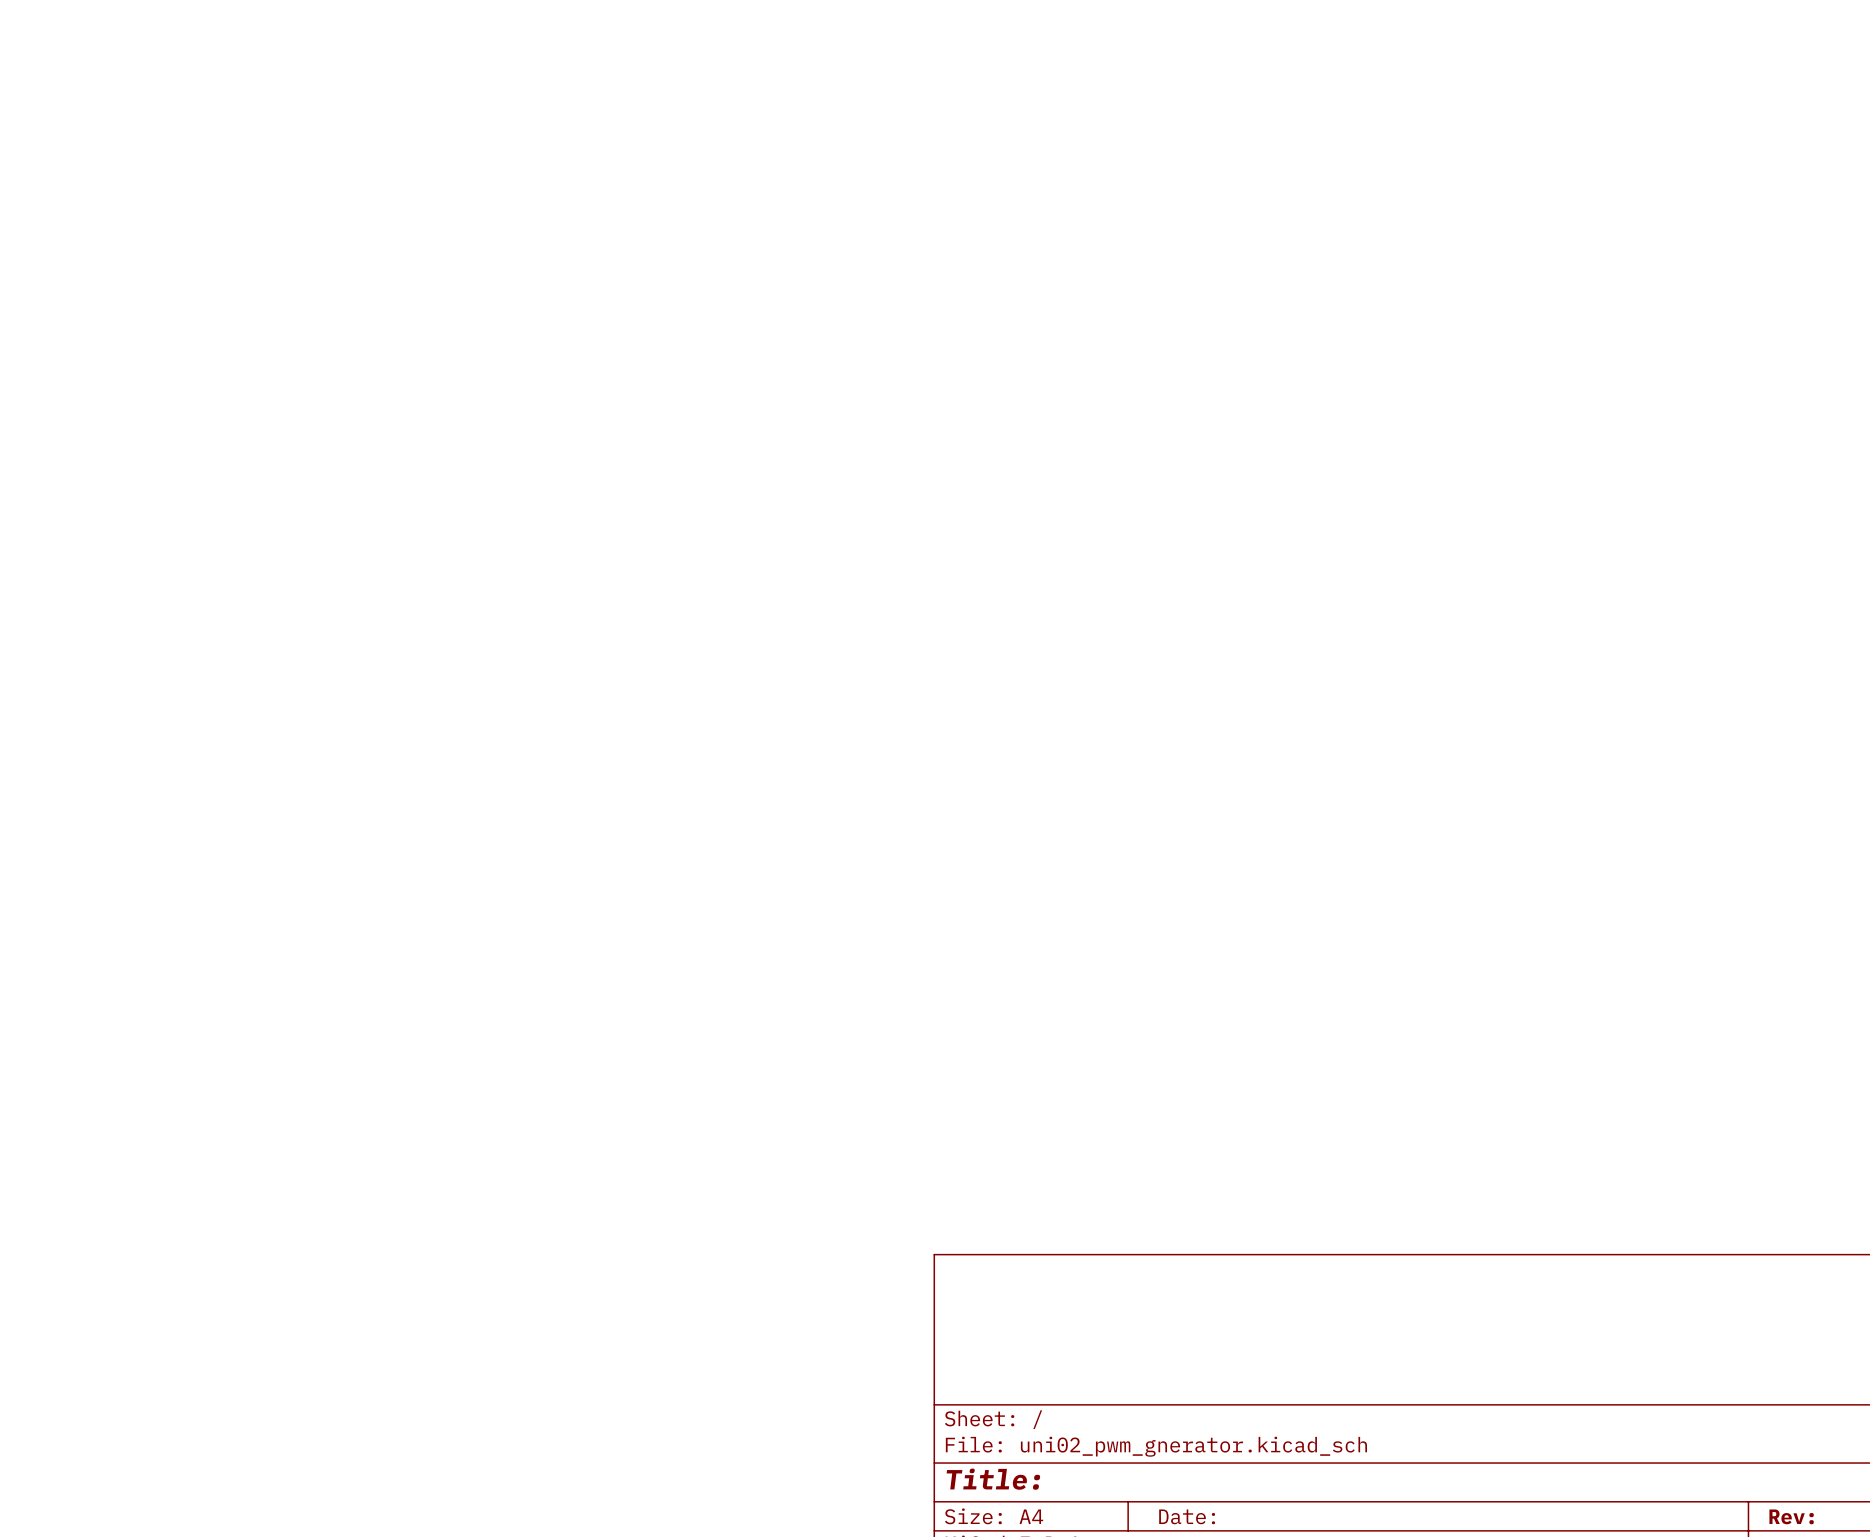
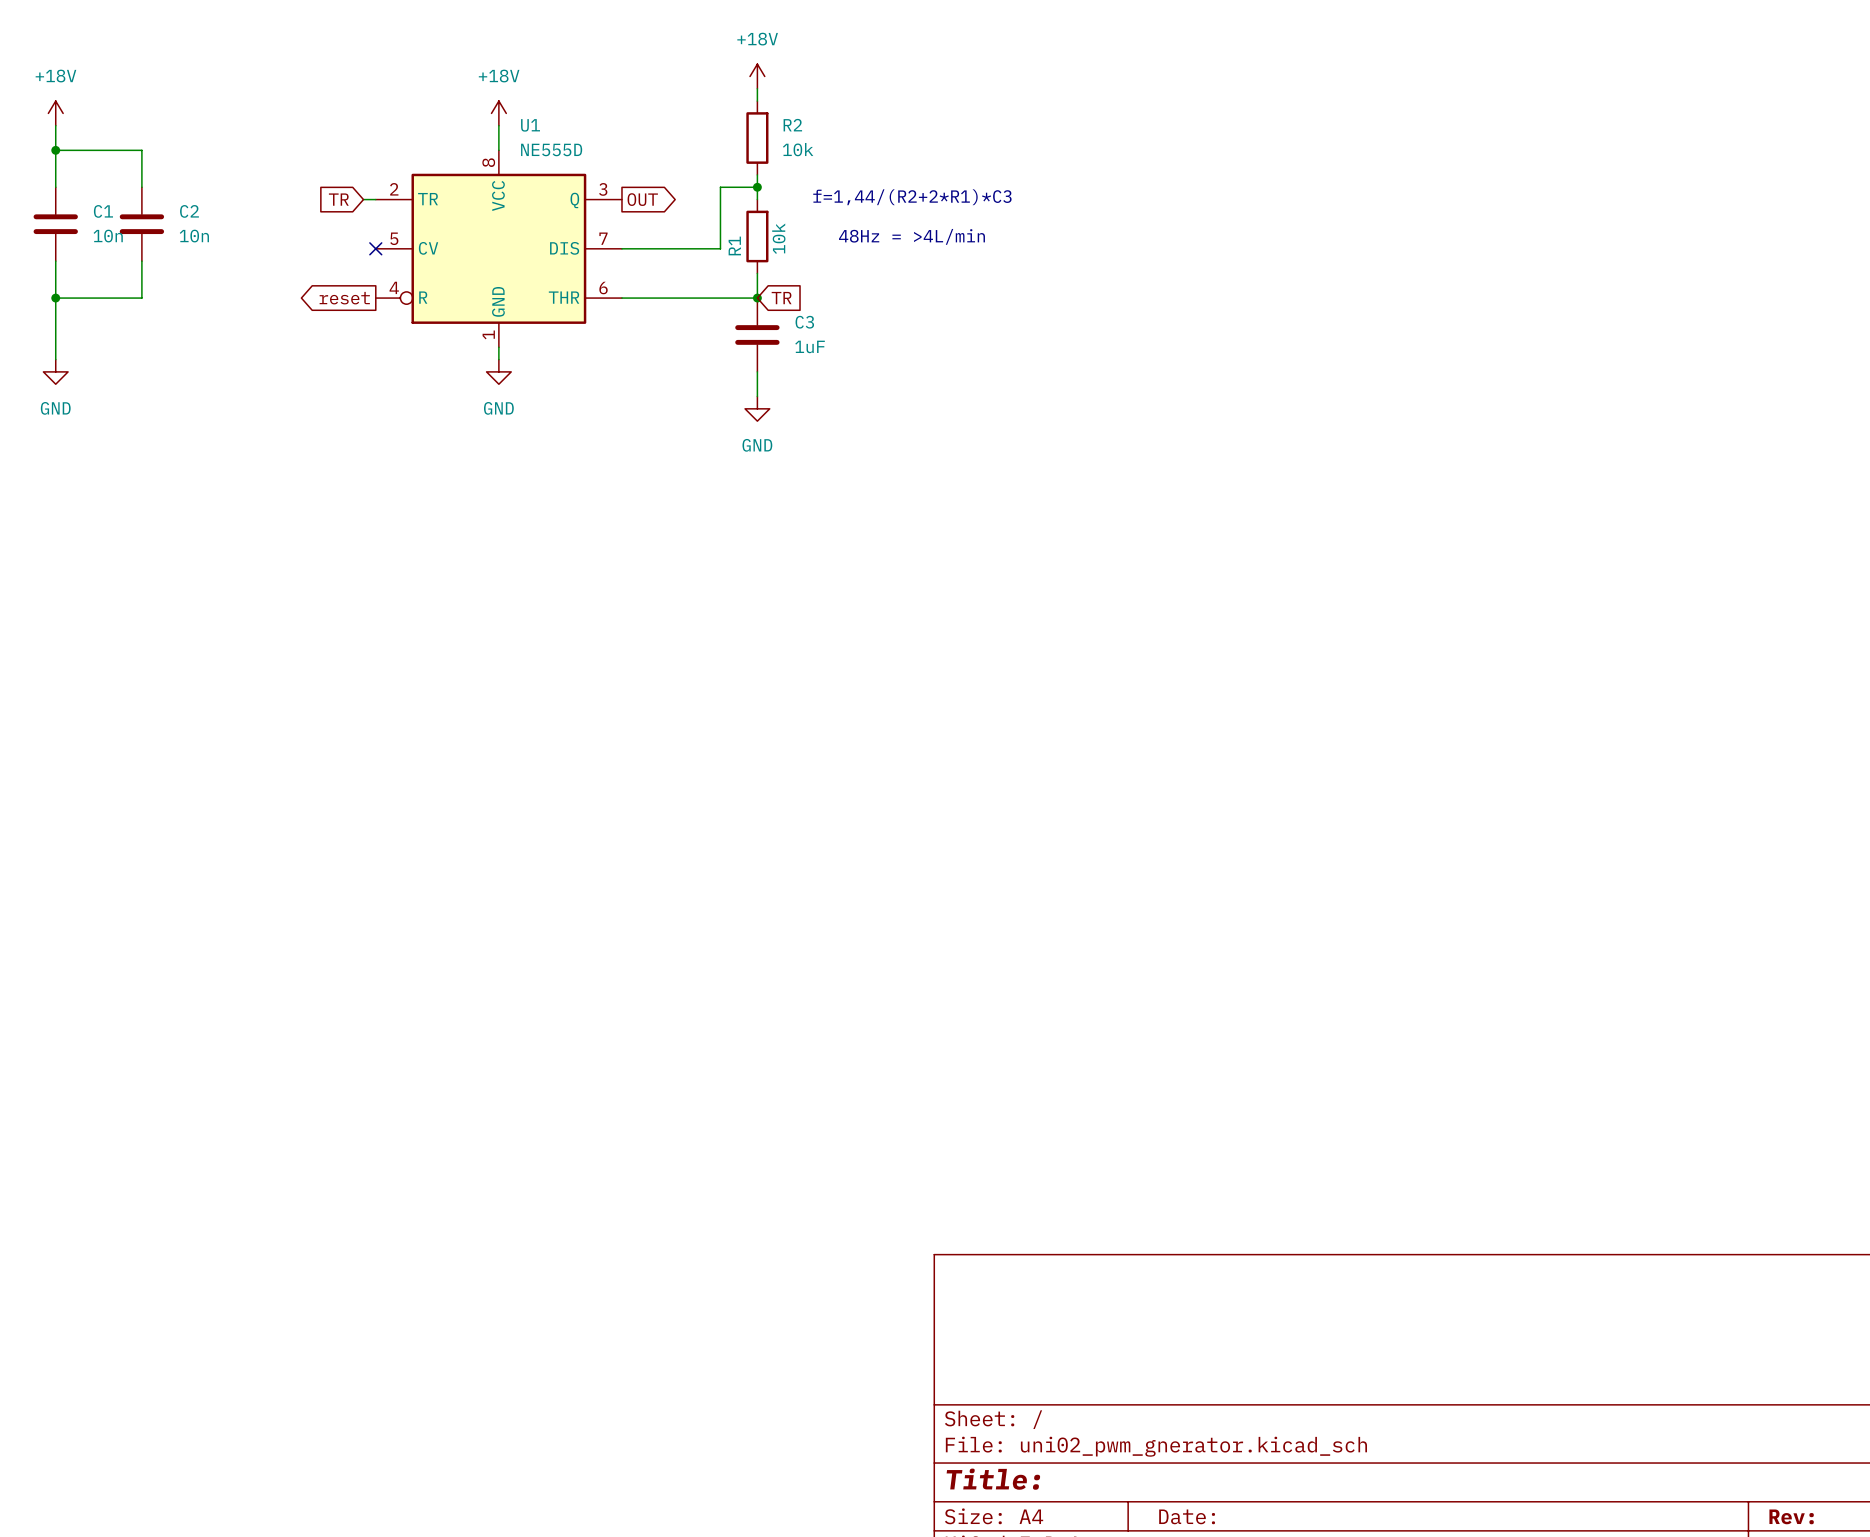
power symbol: none -> +18V (757, 76)
wire: none -> (757, 88) (757, 101)
power symbol: none -> +18V (55, 113)
power symbol: none -> +18V (498, 113)
wire: none -> (55, 125) (55, 187)
wire: none -> (498, 125) (498, 150)
R2: none -> 10k (757, 138)
wire: none -> (55, 150) (141, 150) (141, 187)
junction: none -> (55, 150)
wire: none -> (757, 174) (757, 199)
wire: none -> (757, 187) (720, 187) (720, 248) (621, 248)
junction: none -> (757, 187)
text: none -> f=1,44/(R2+2*R1)*C3 (912, 197)
global label: none -> TR (338, 199)
wire: none -> (363, 199) (375, 199)
global label: none -> OUT (642, 199)
C1: none -> 10n (55, 224)
C2: none -> 10n (141, 224)
R1: none -> 10k (757, 236)
text: none -> 48Hz = >4L/min (911, 236)
no-connect mark: none -> (375, 248)
U1: none -> NE555D (498, 248)
wire: none -> (55, 261) (55, 359)
wire: none -> (141, 261) (141, 298) (55, 298)
wire: none -> (757, 273) (757, 298) (621, 298)
junction: none -> (55, 298)
global label: none -> reset (344, 298)
junction: none -> (757, 298)
global label: none -> TR (781, 298)
C3: none -> 1uF (757, 334)
wire: none -> (498, 347) (498, 359)
power symbol: none -> GND (55, 371)
power symbol: none -> GND (498, 371)
wire: none -> (757, 371) (757, 396)
power symbol: none -> GND (757, 408)

